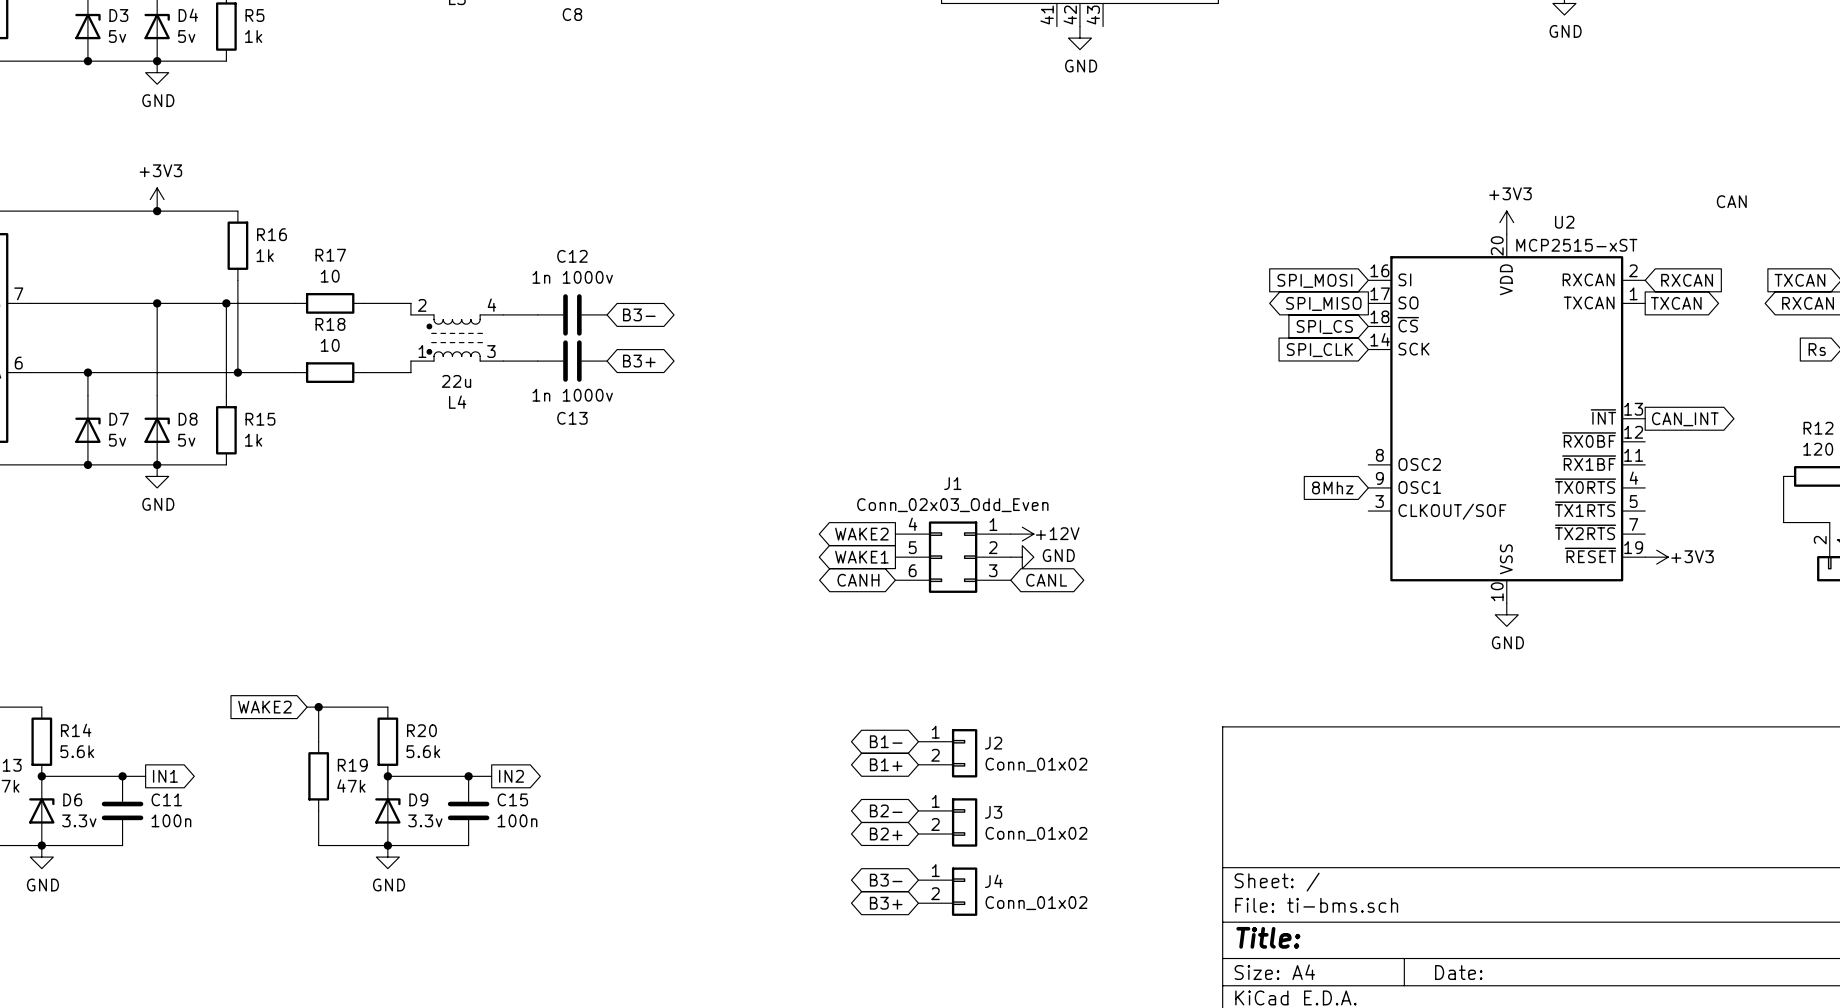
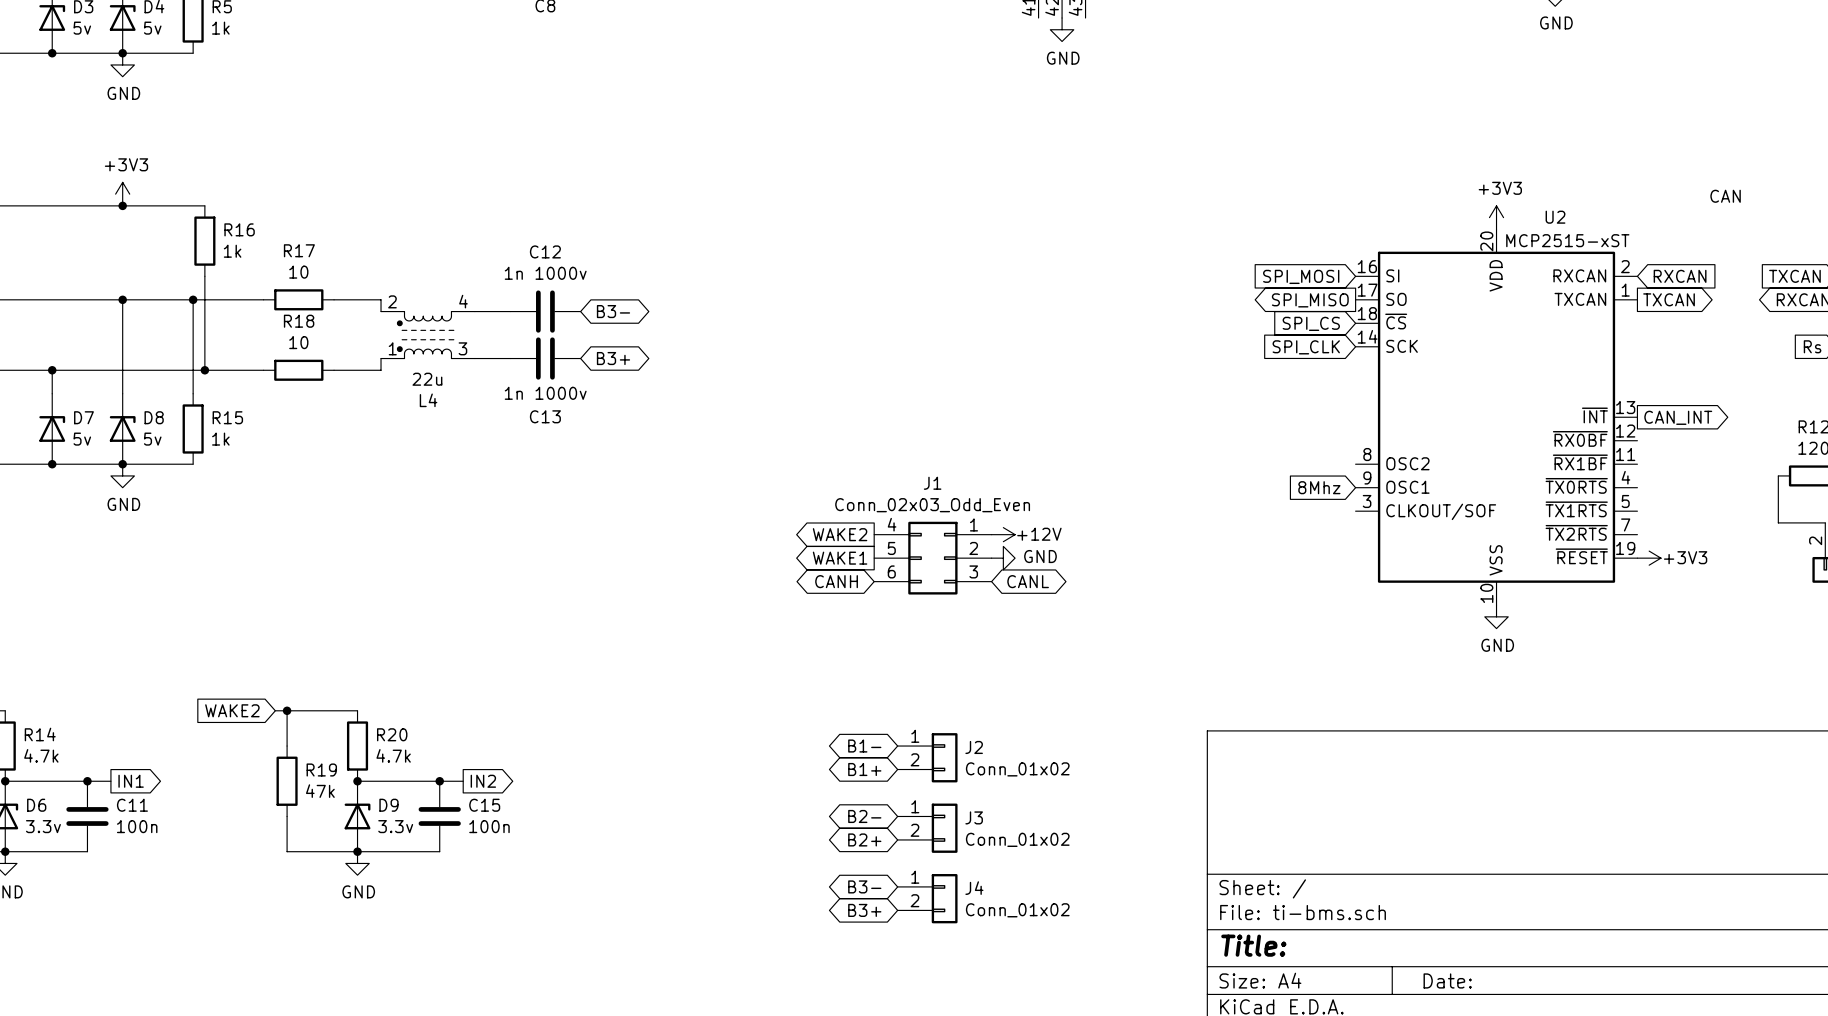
R14 value: 5.6k (77, 751) -> 4.7k (41, 755)
R20 value: 5.6k (423, 751) -> 4.7k (393, 755)

